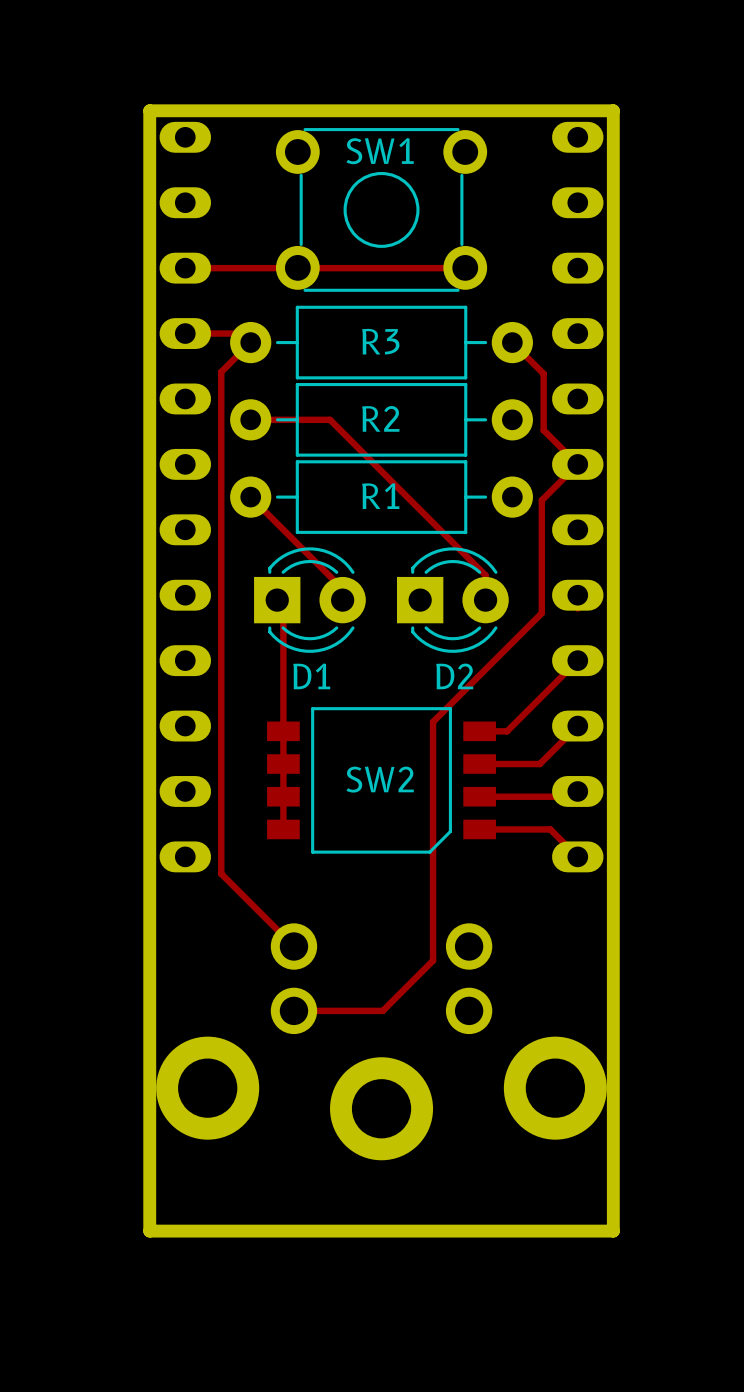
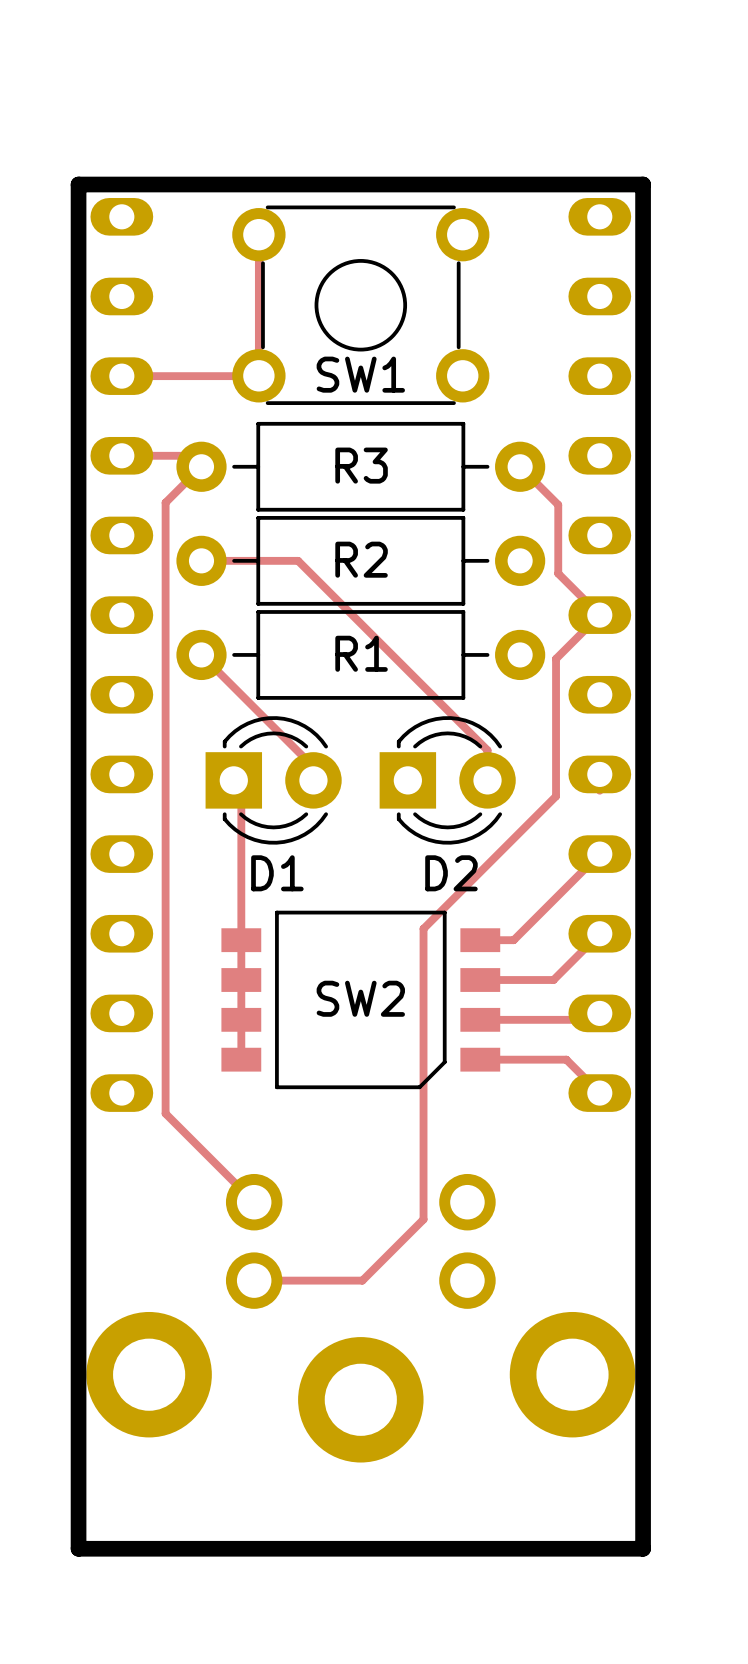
SW1 name position: SW1 (380, 151) -> SW1 (360, 374)
track: (294, 268) (464, 268) -> (254, 376) (258, 380) (258, 239)

